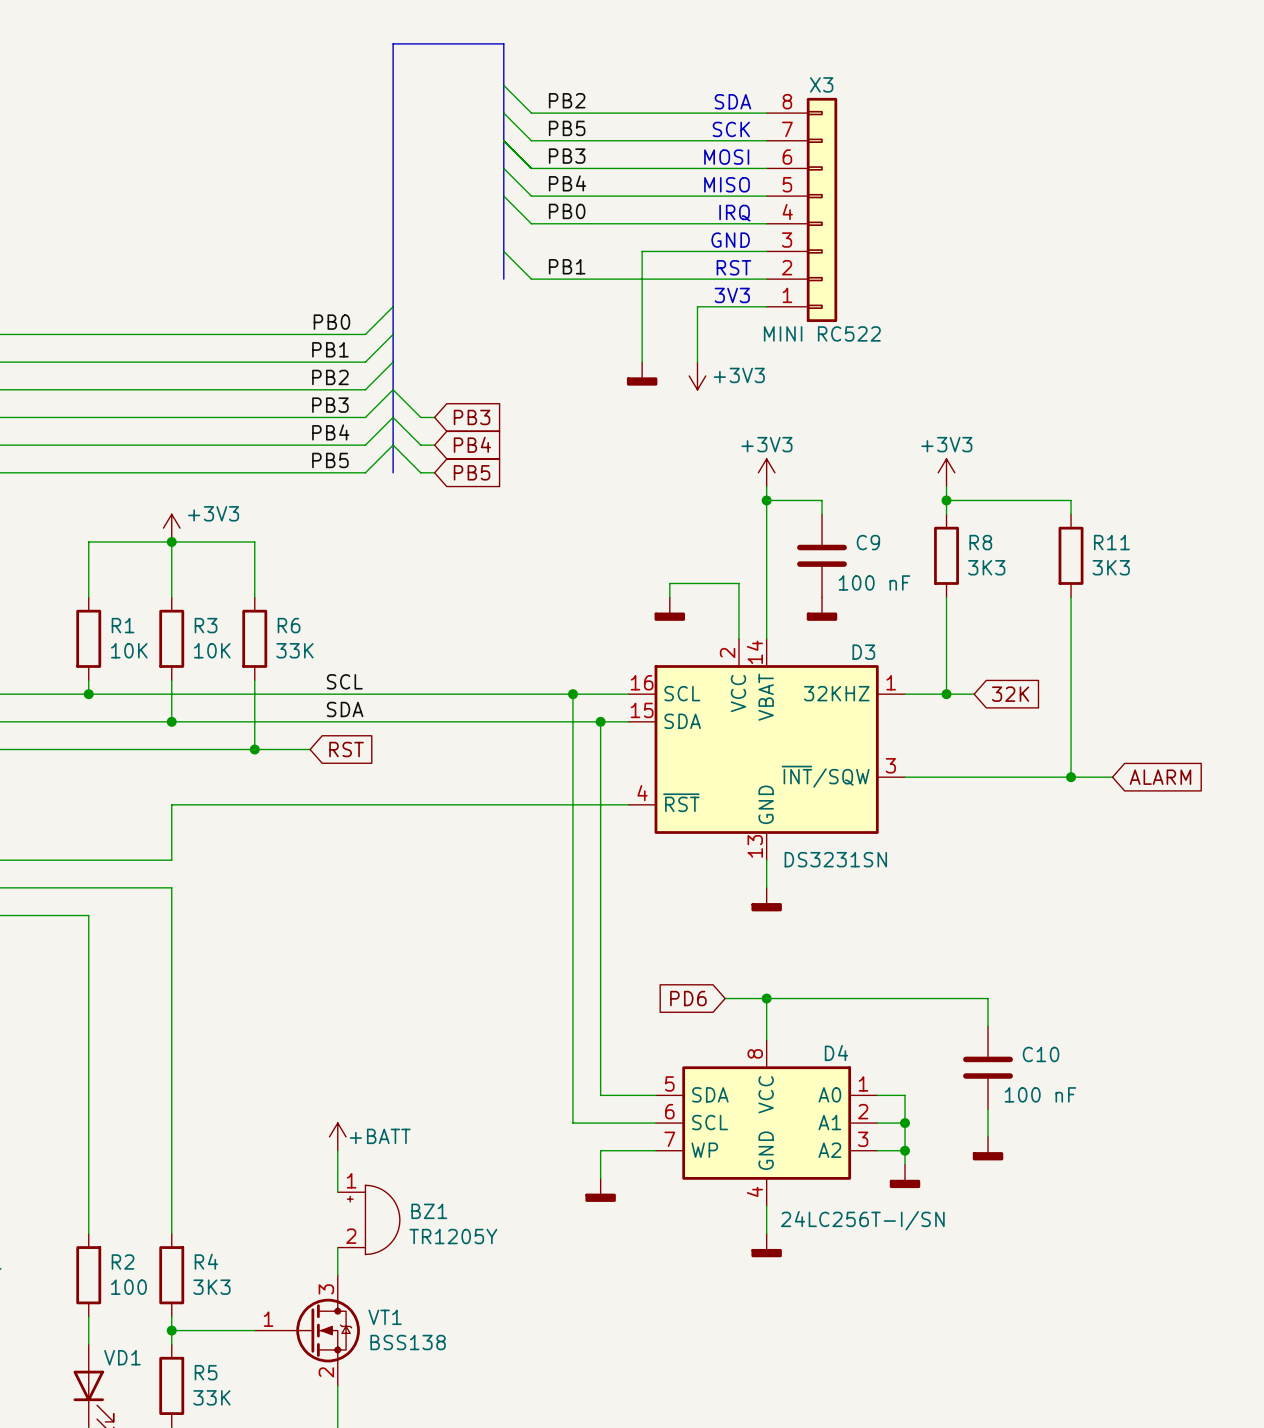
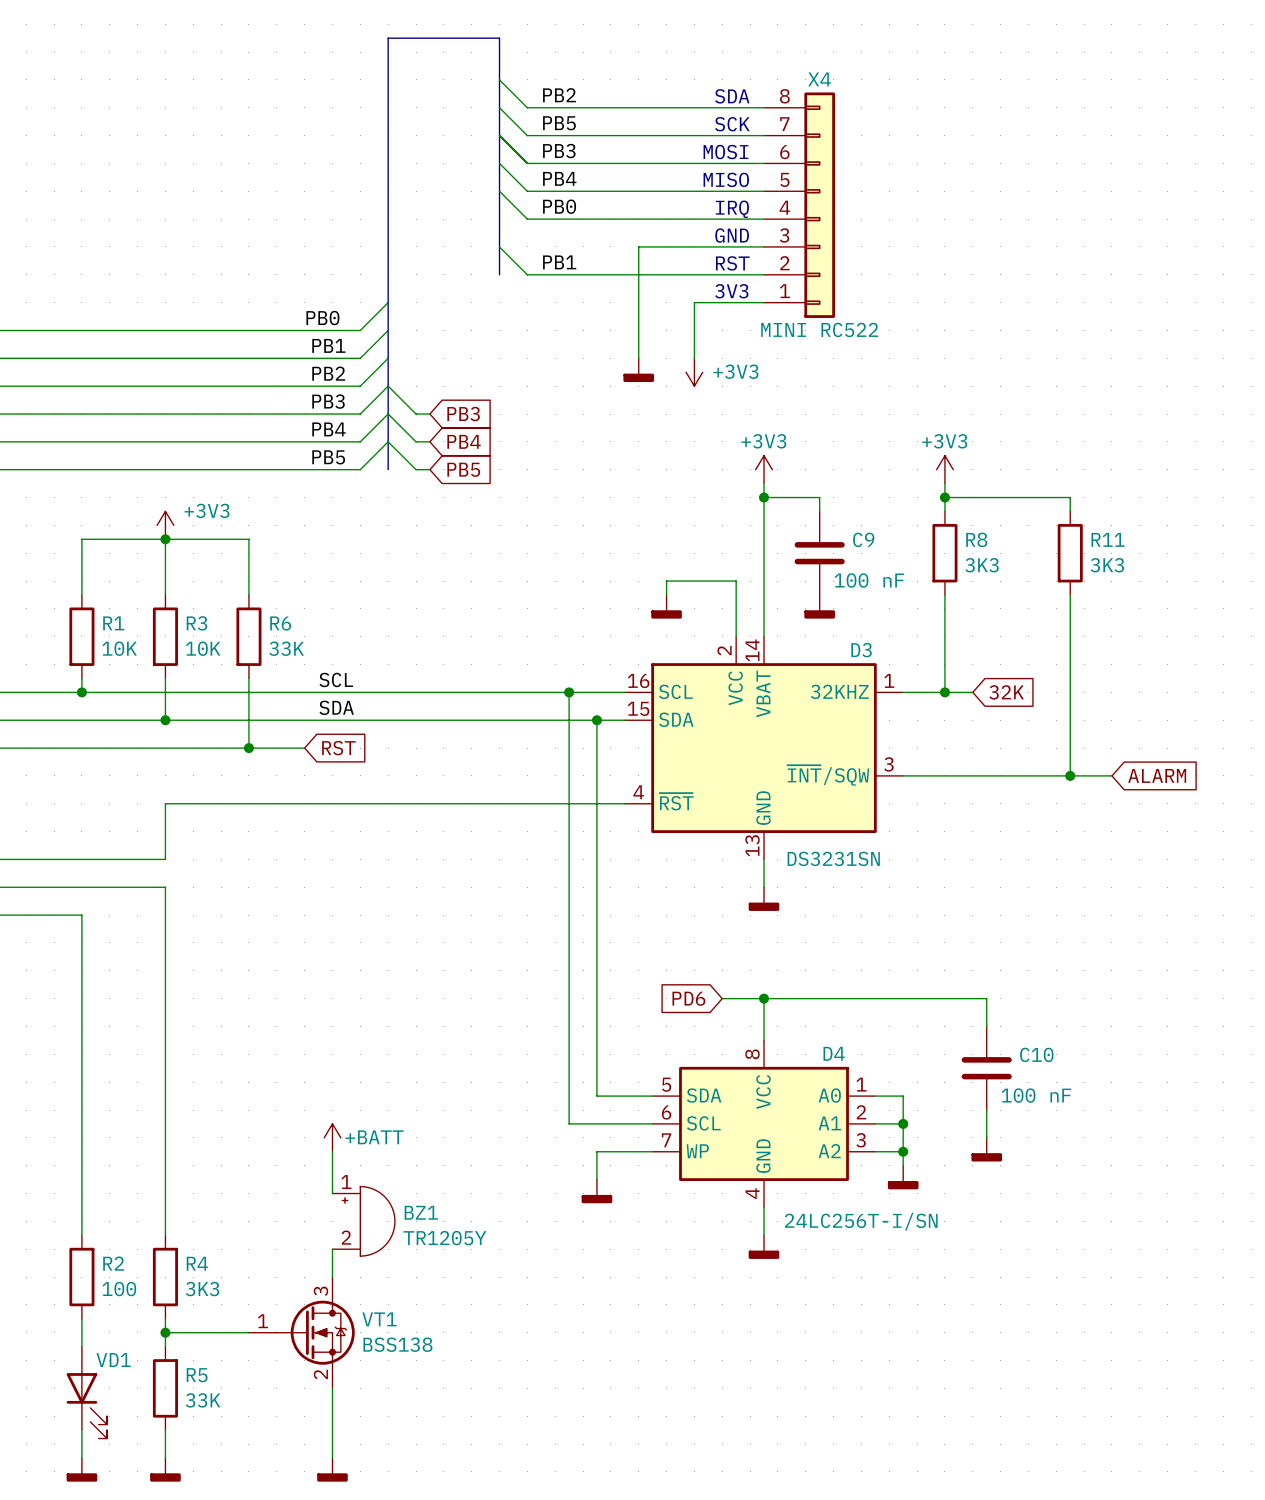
X3 name: X3 (821, 84) -> X4 (819, 79)

